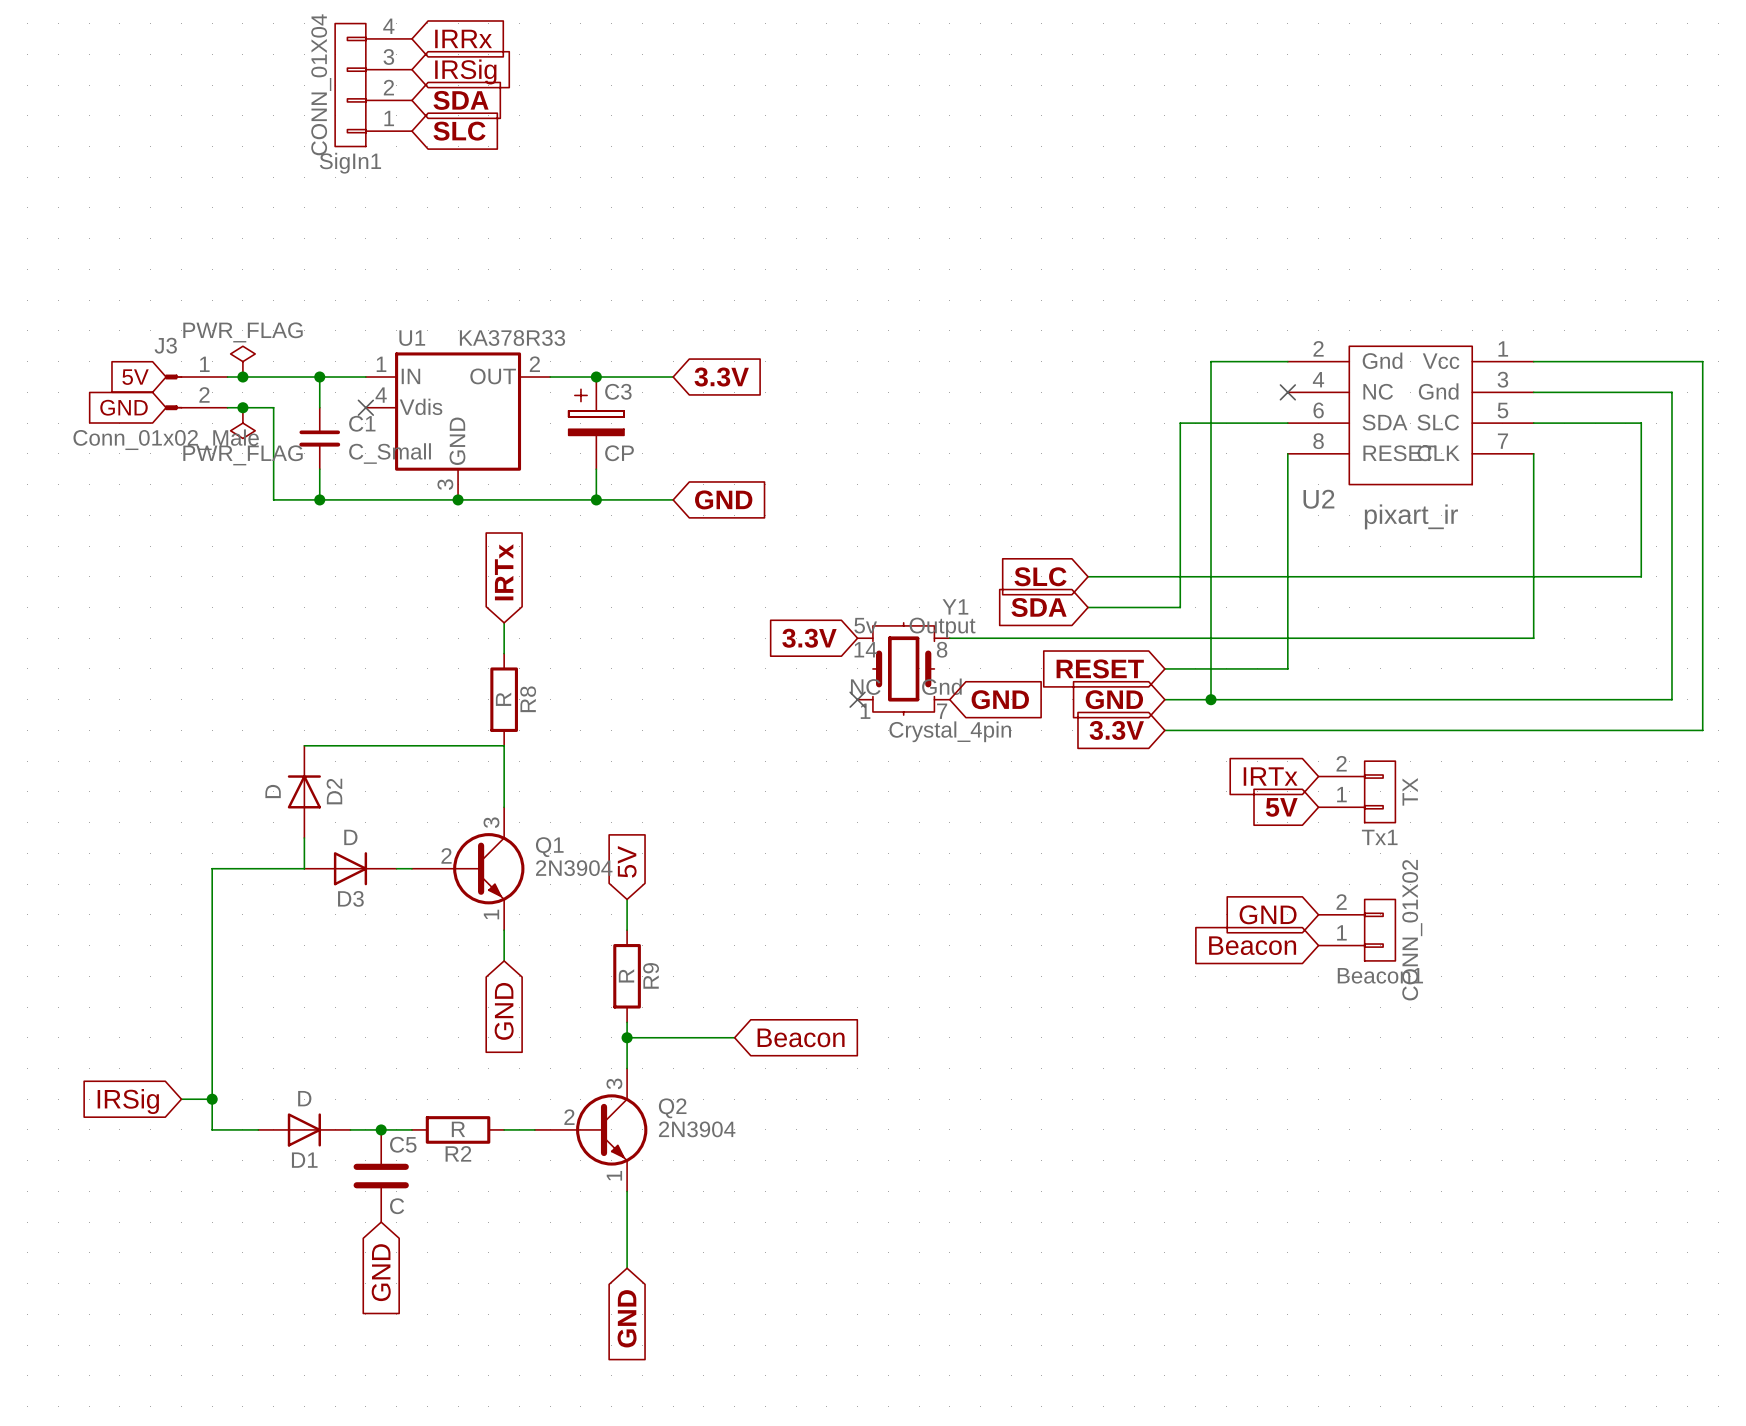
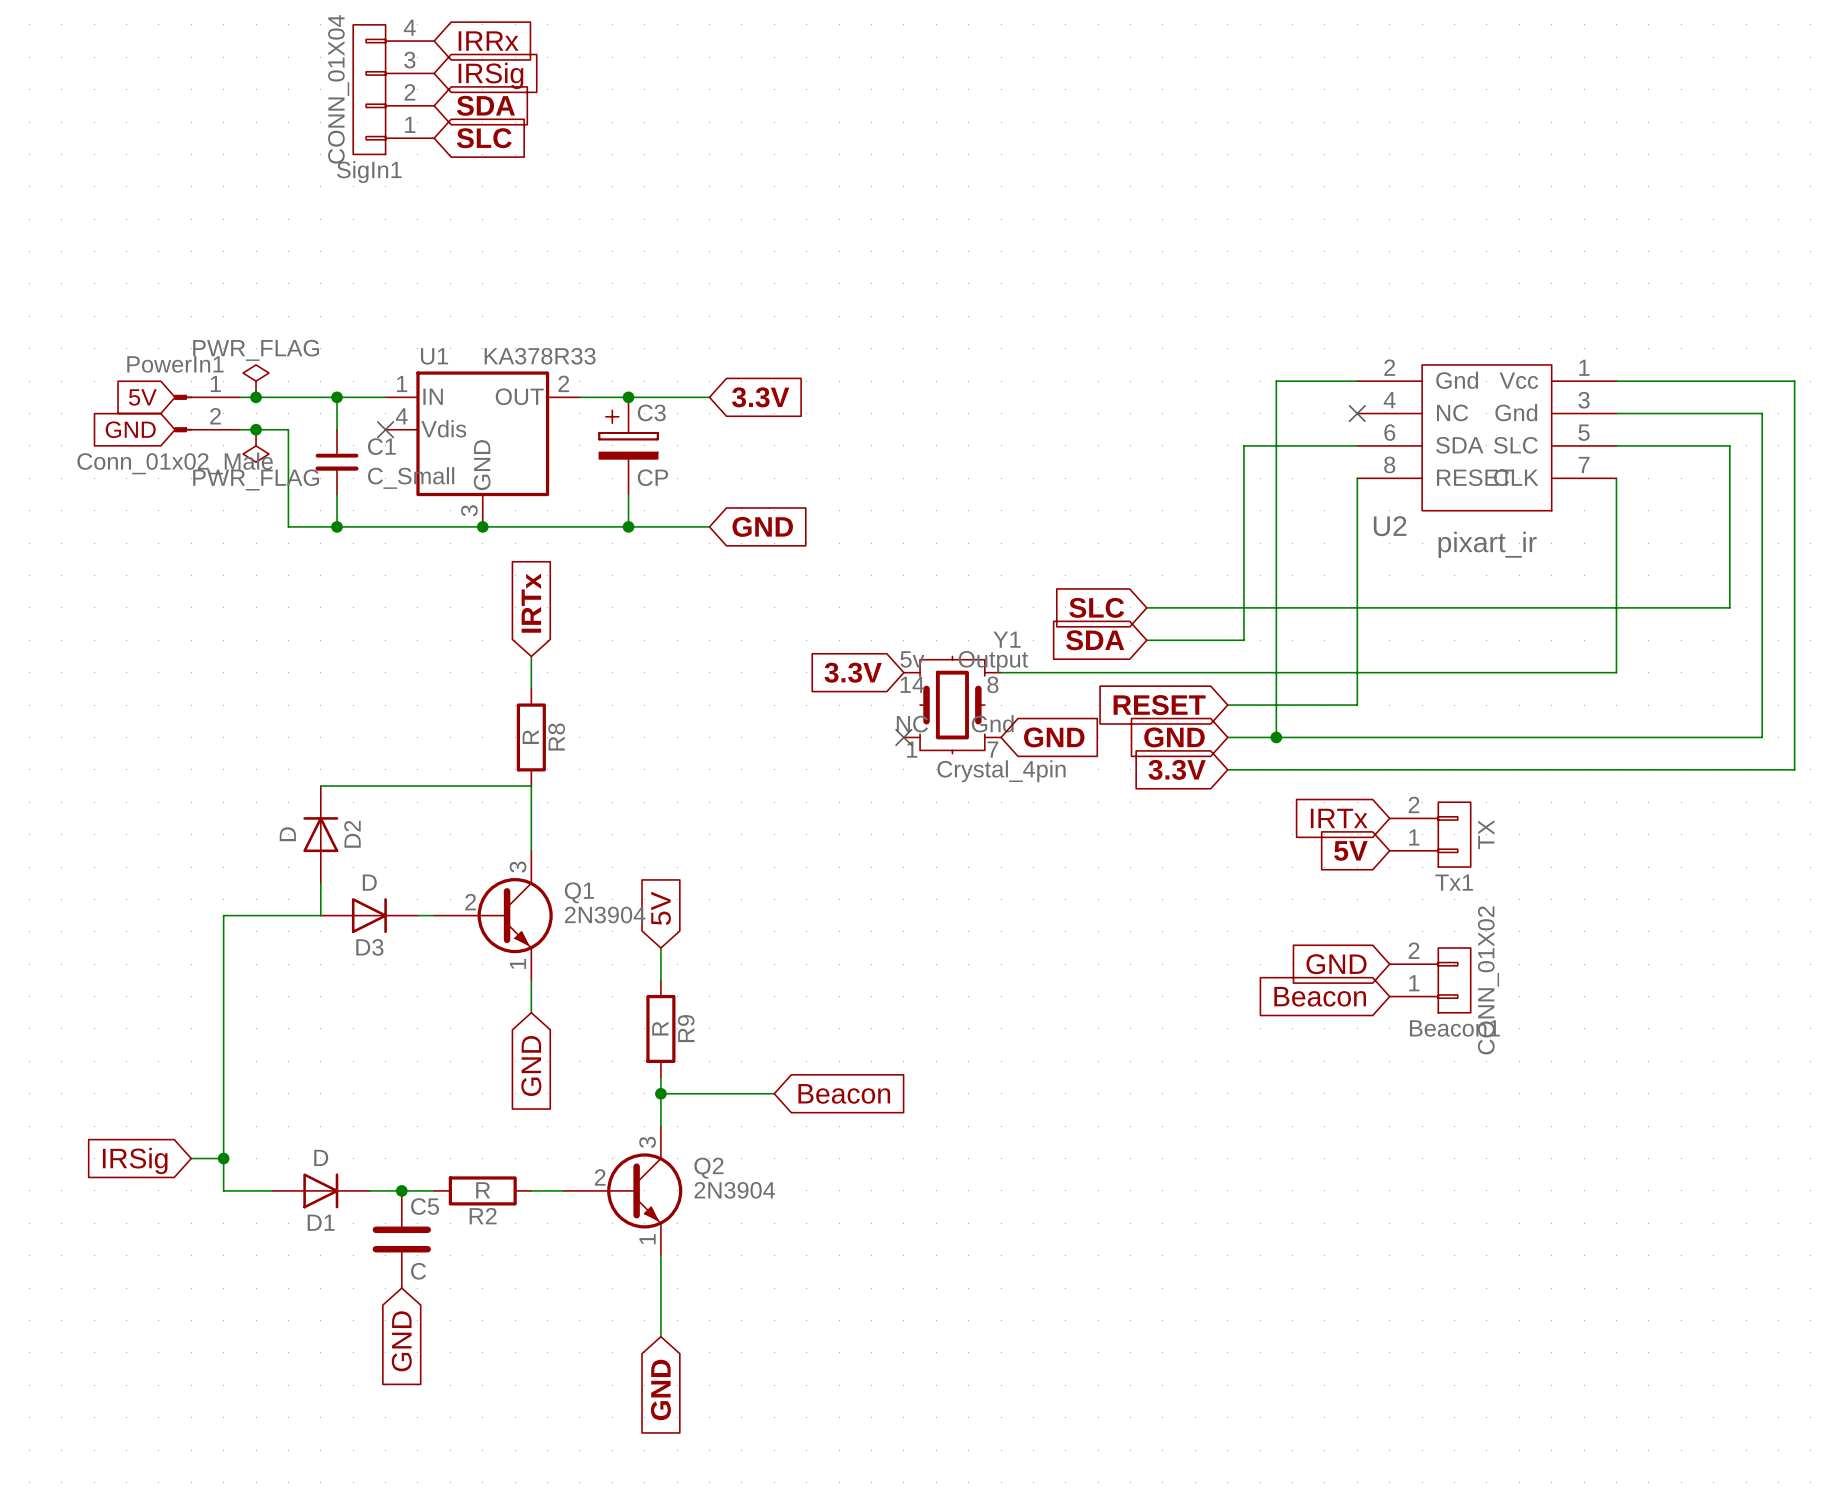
J3 name: J3 (165, 345) -> PowerIn1 (175, 364)

